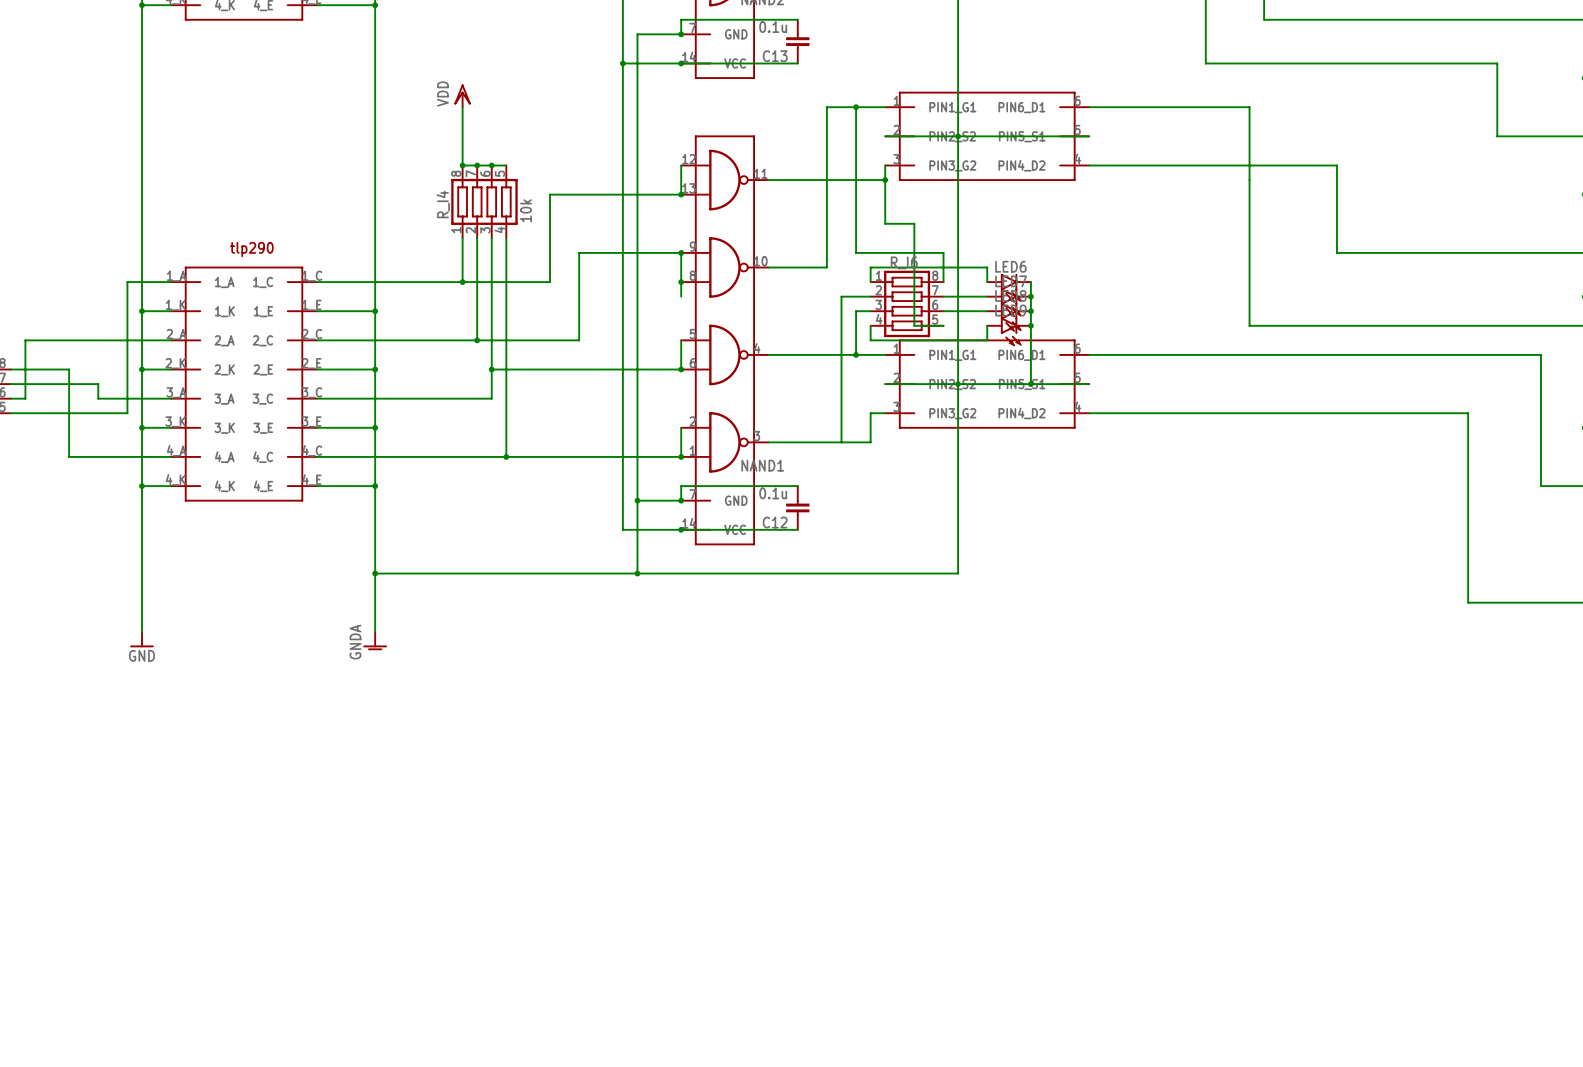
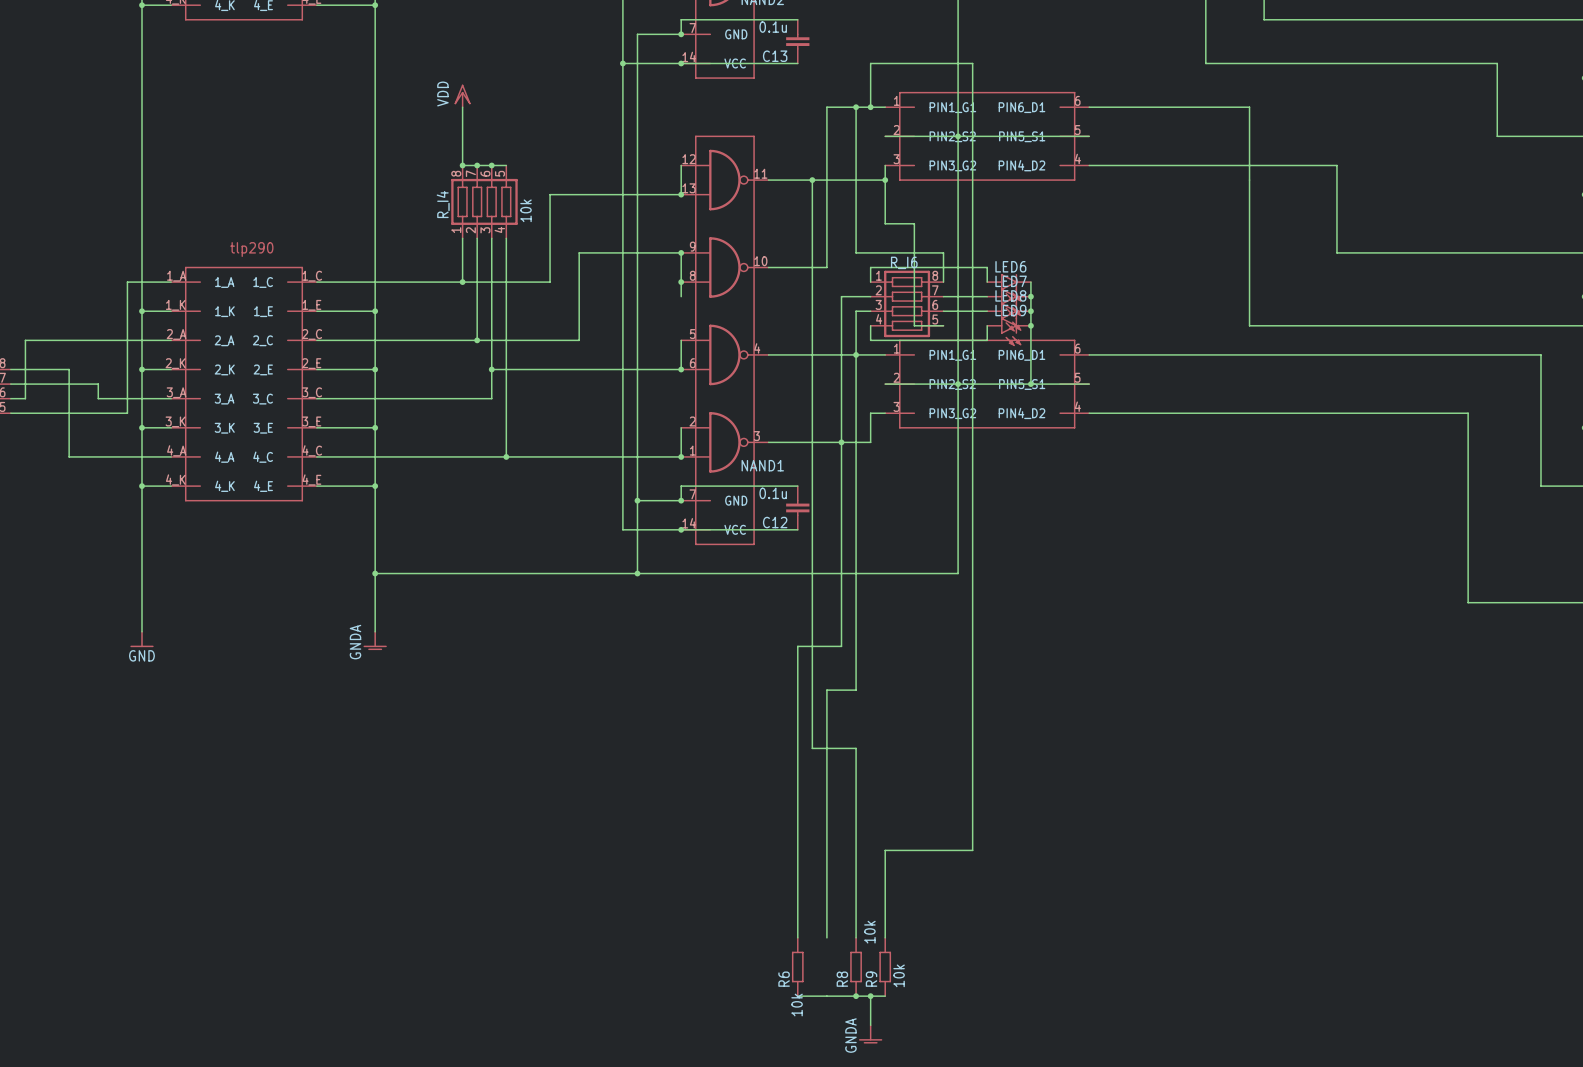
wire: none -> (870, 107) (870, 63) (972, 63) (972, 850) (885, 850) (885, 937)
junction: none -> (870, 107)
wire: none -> (812, 180) (812, 748) (856, 748) (856, 937)
junction: none -> (812, 180)
wire: none -> (856, 354) (856, 690) (826, 690) (826, 937)
wire: none -> (841, 442) (841, 646) (797, 646) (797, 937)
junction: none -> (841, 442)
R6: none -> 10k (797, 967)
R8: none -> 10k (856, 967)
R9: none -> 10k (885, 967)
wire: none -> (797, 996) (885, 996)
junction: none -> (856, 996)
wire: none -> (870, 996) (870, 1025)
junction: none -> (870, 996)
power symbol: none -> GNDA (870, 1034)

